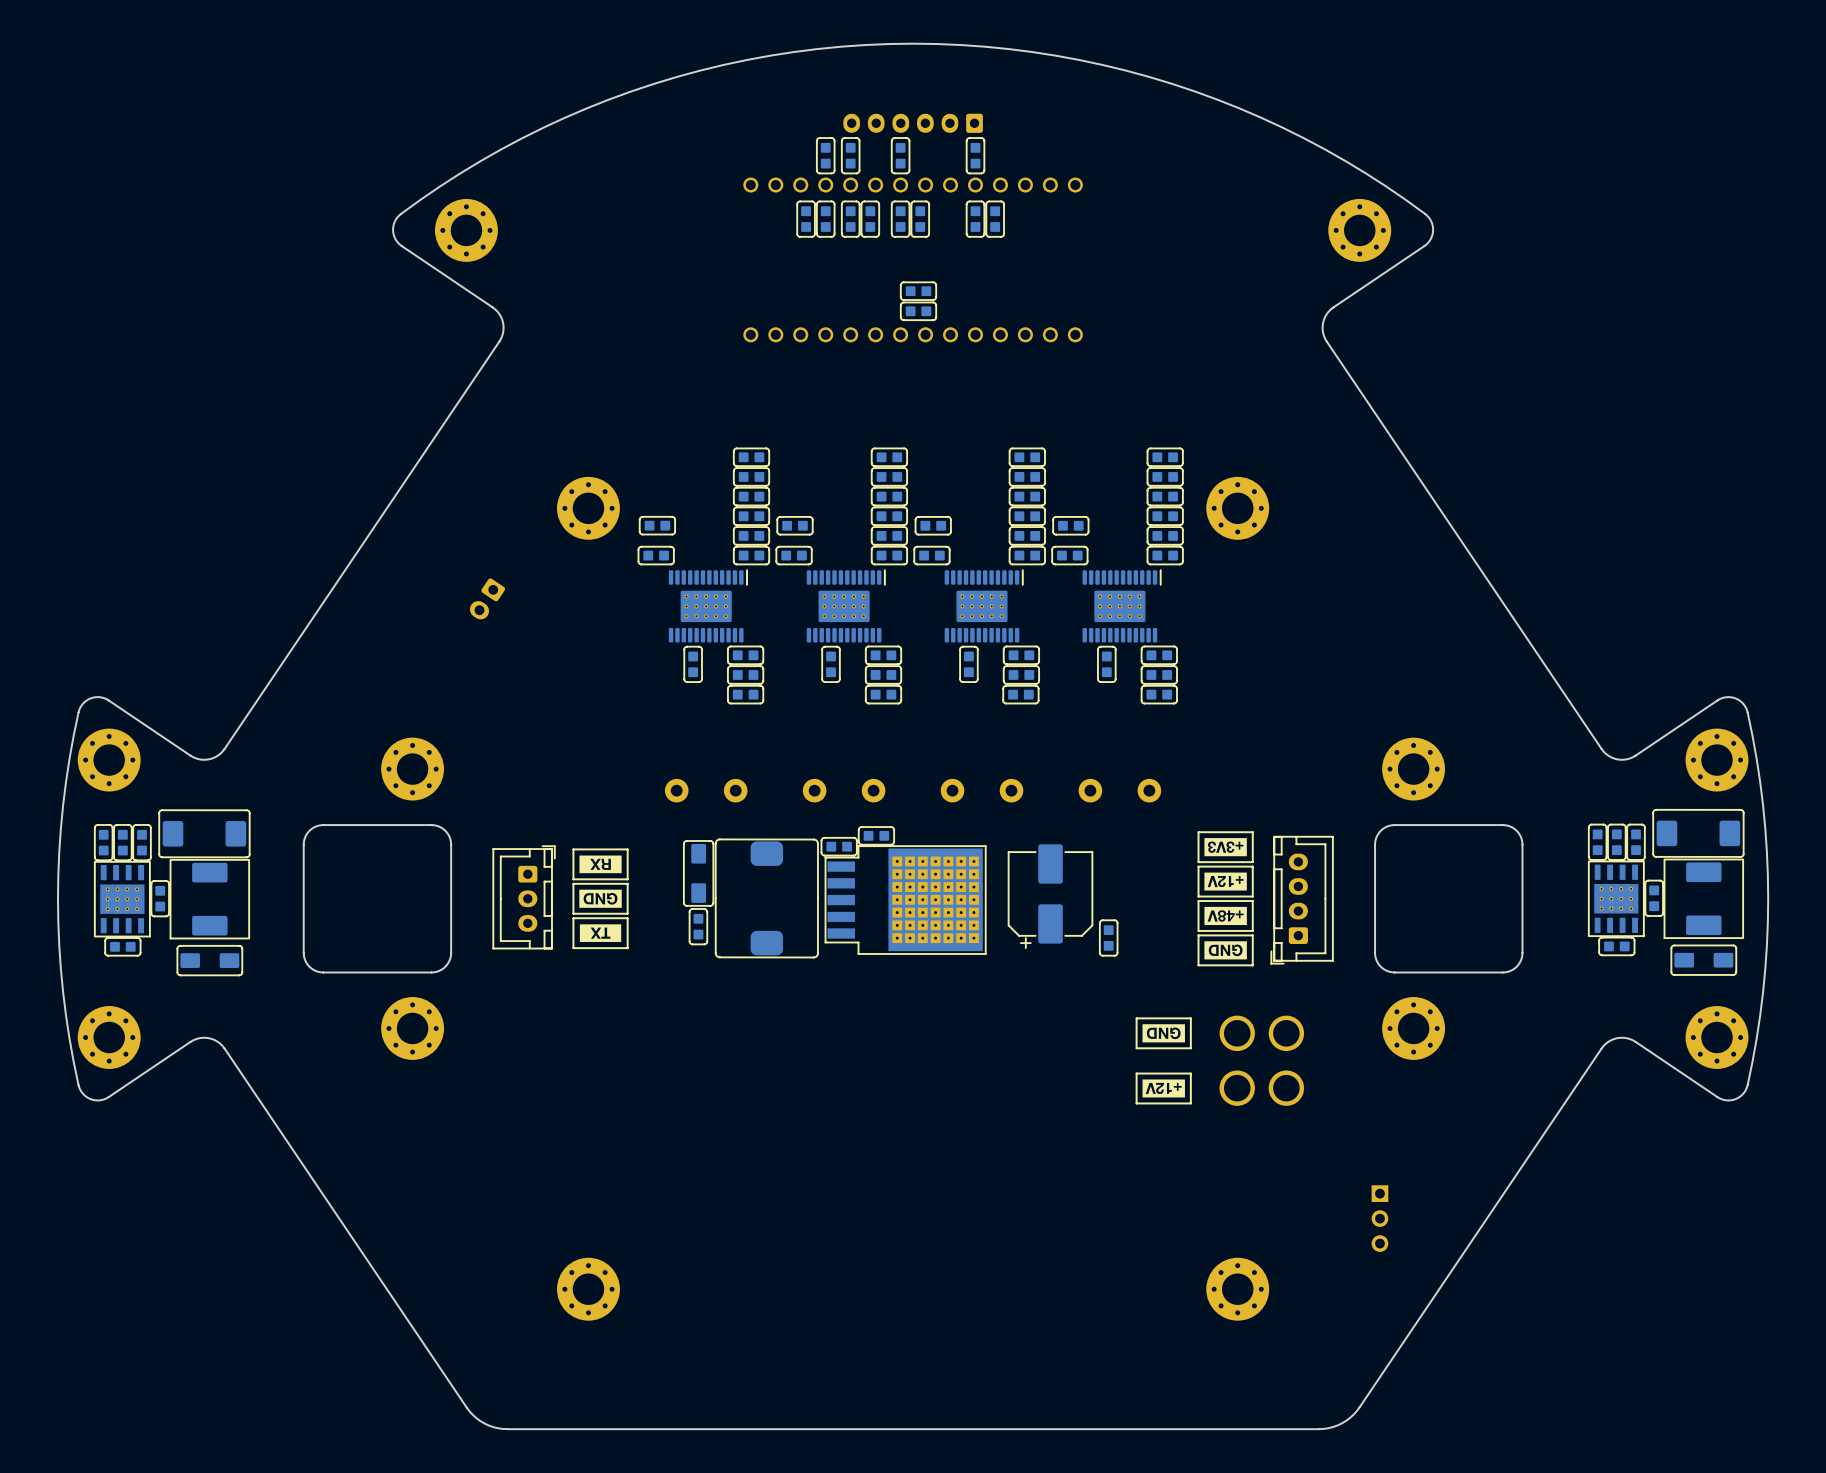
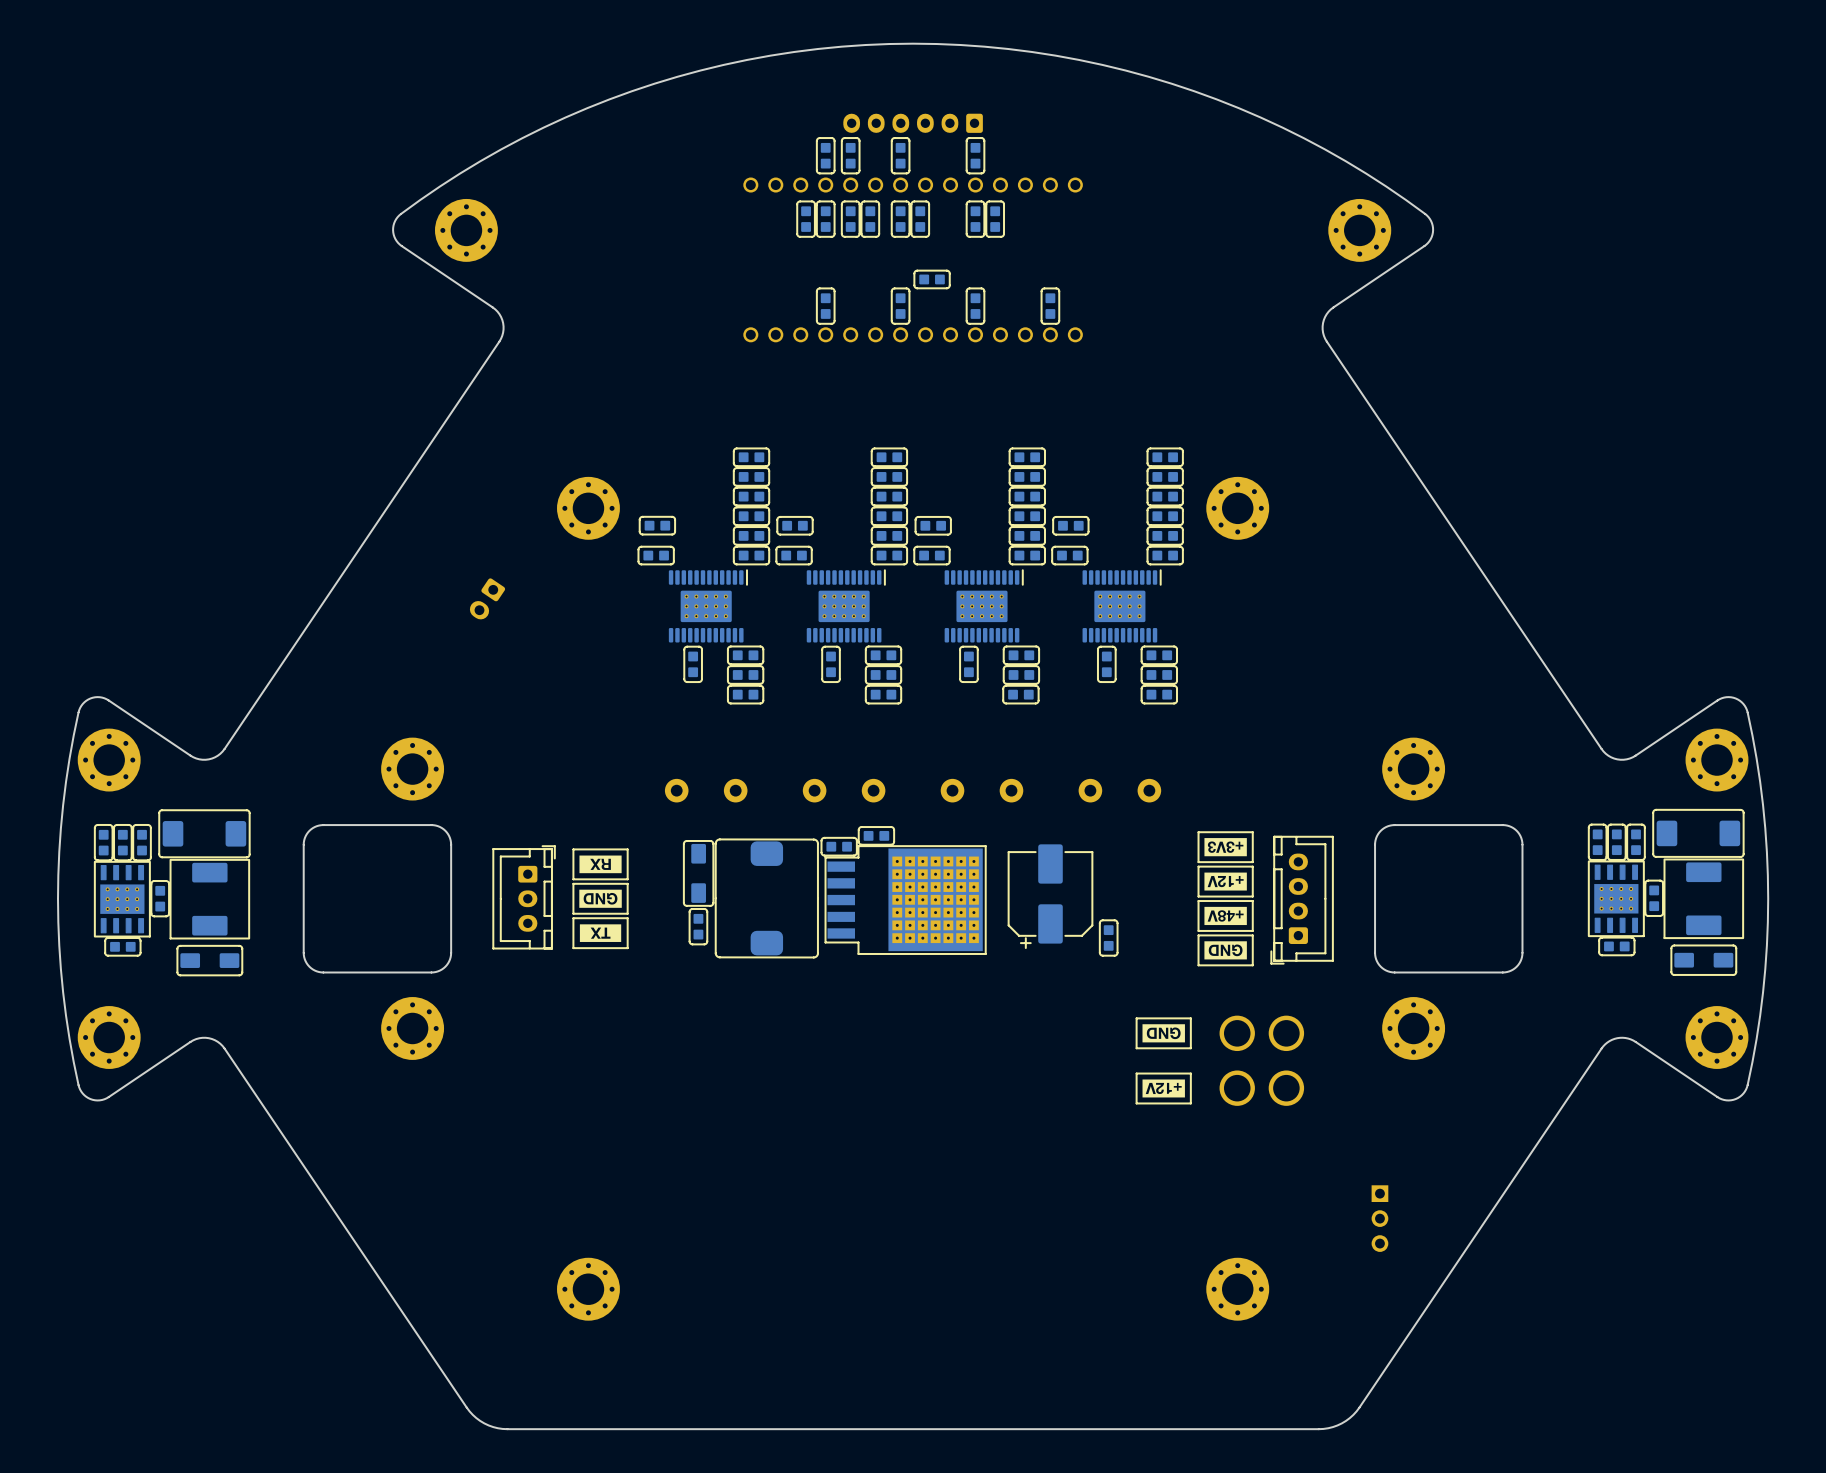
part: none -> (932, 279)
part: (918, 291) -> none
part: none -> (825, 306)
part: none -> (900, 306)
part: none -> (975, 306)
part: none -> (1050, 306)
part: (918, 311) -> none

